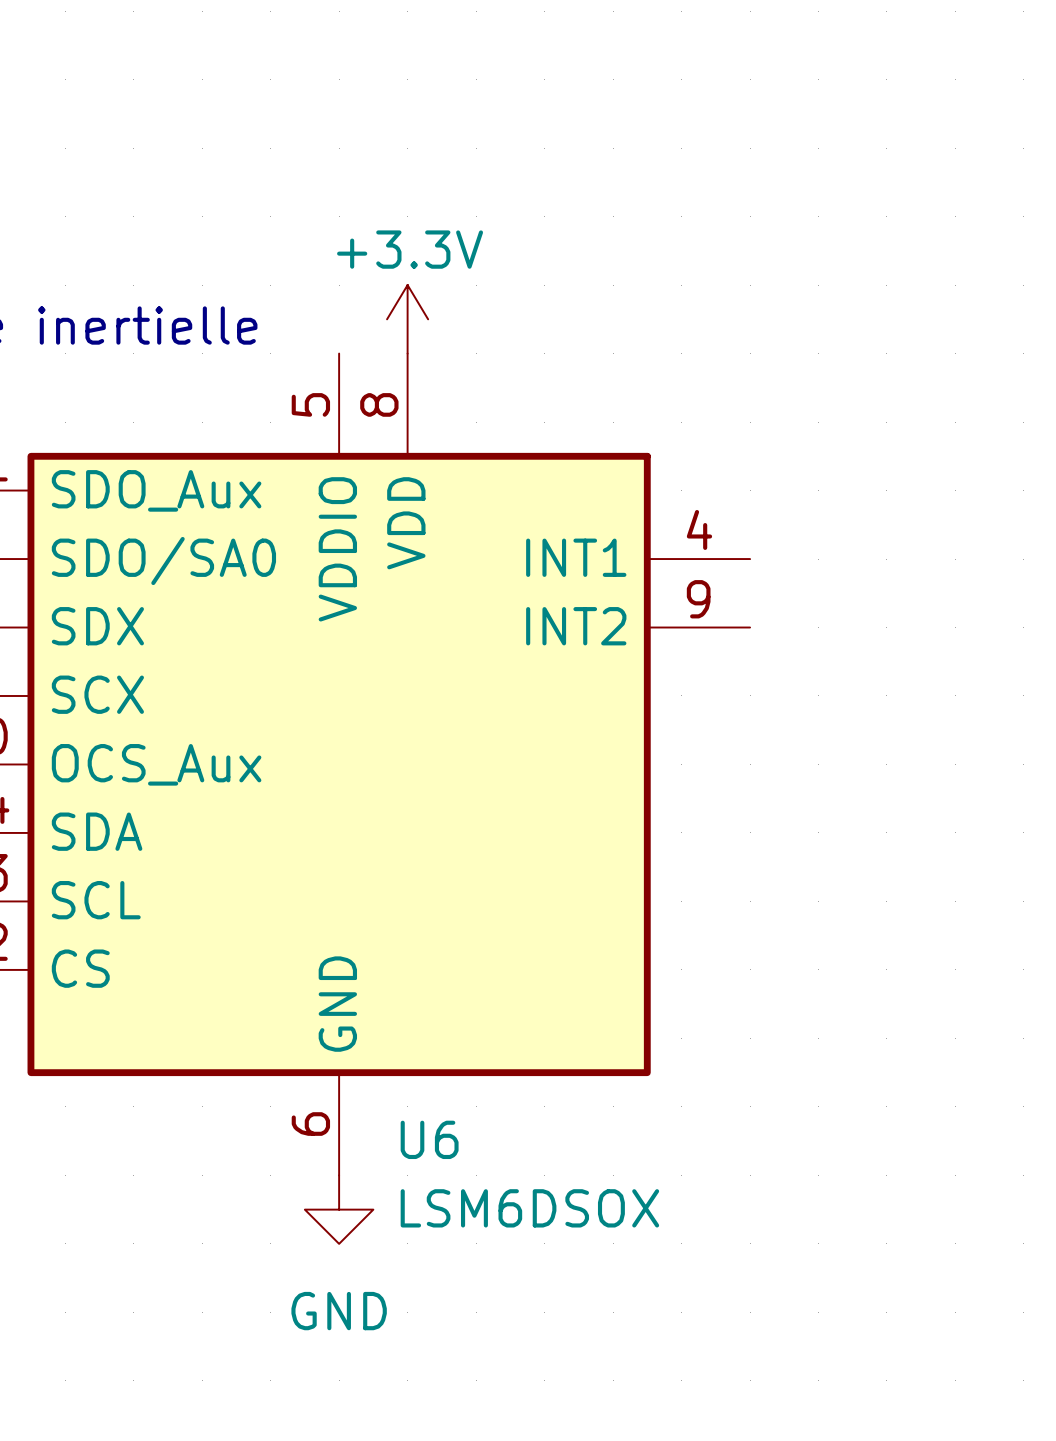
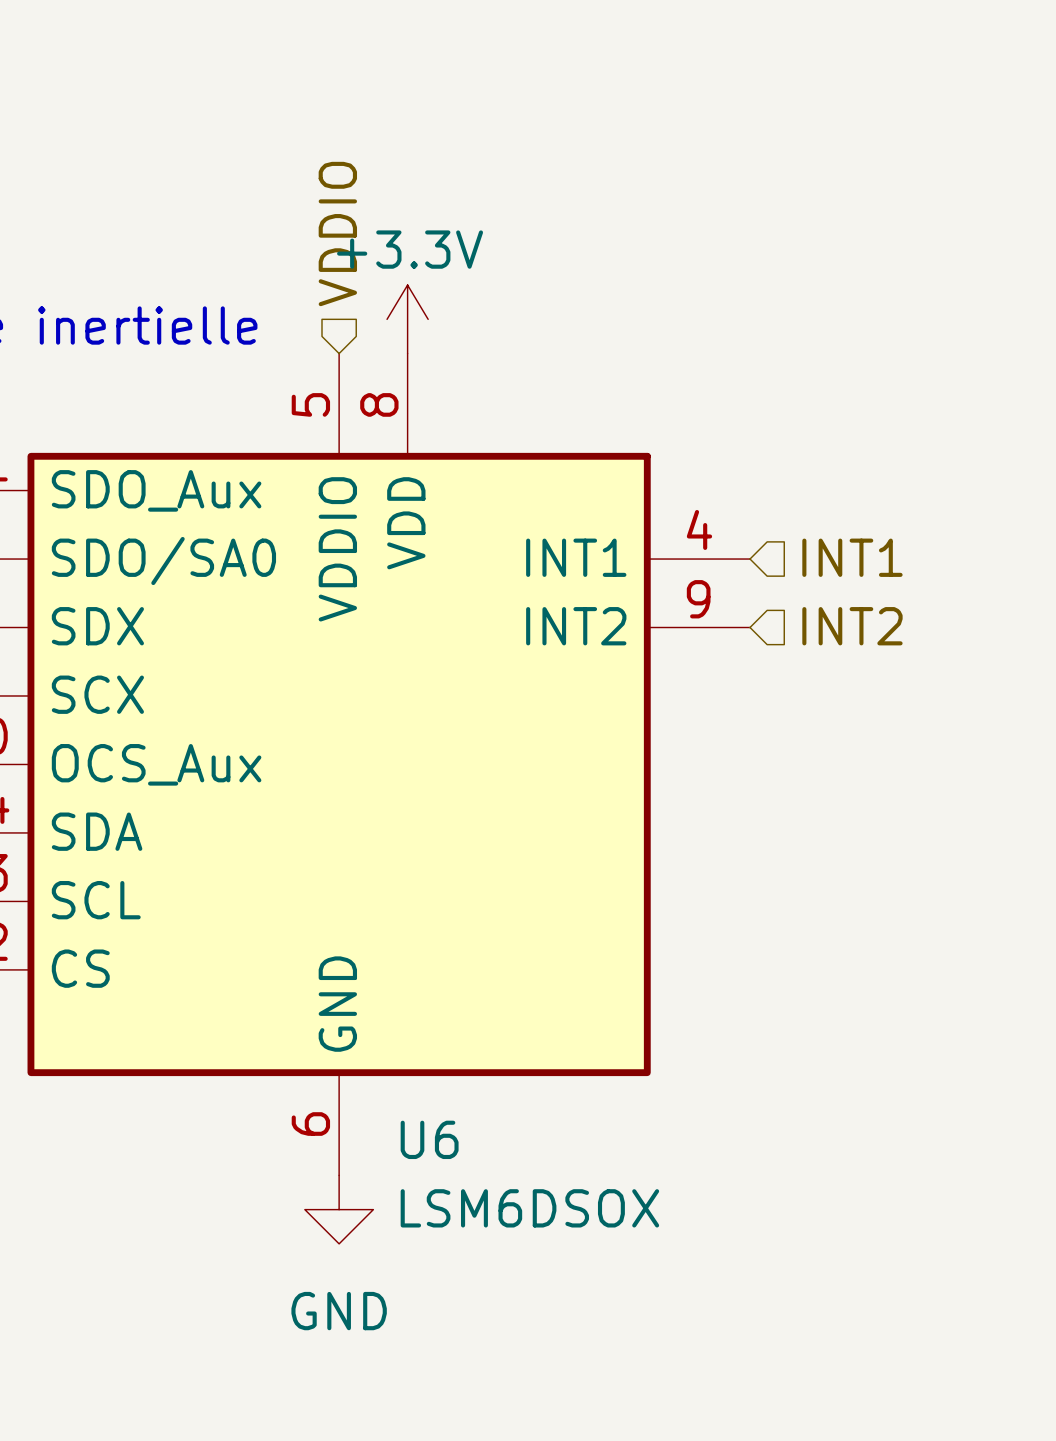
hierarchical label: none -> VDDIO (337, 234)
hierarchical label: none -> INT1 (852, 557)
hierarchical label: none -> INT2 (852, 626)

